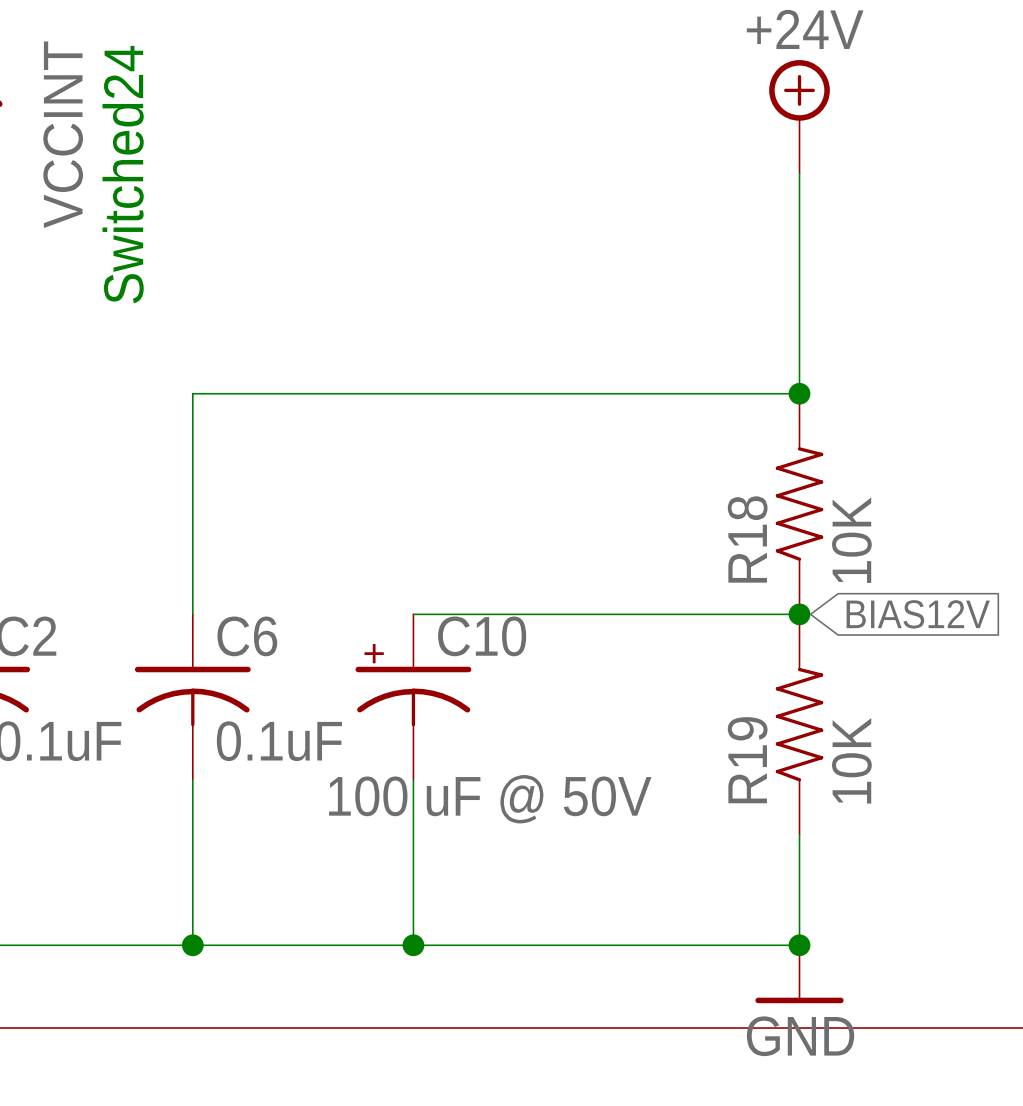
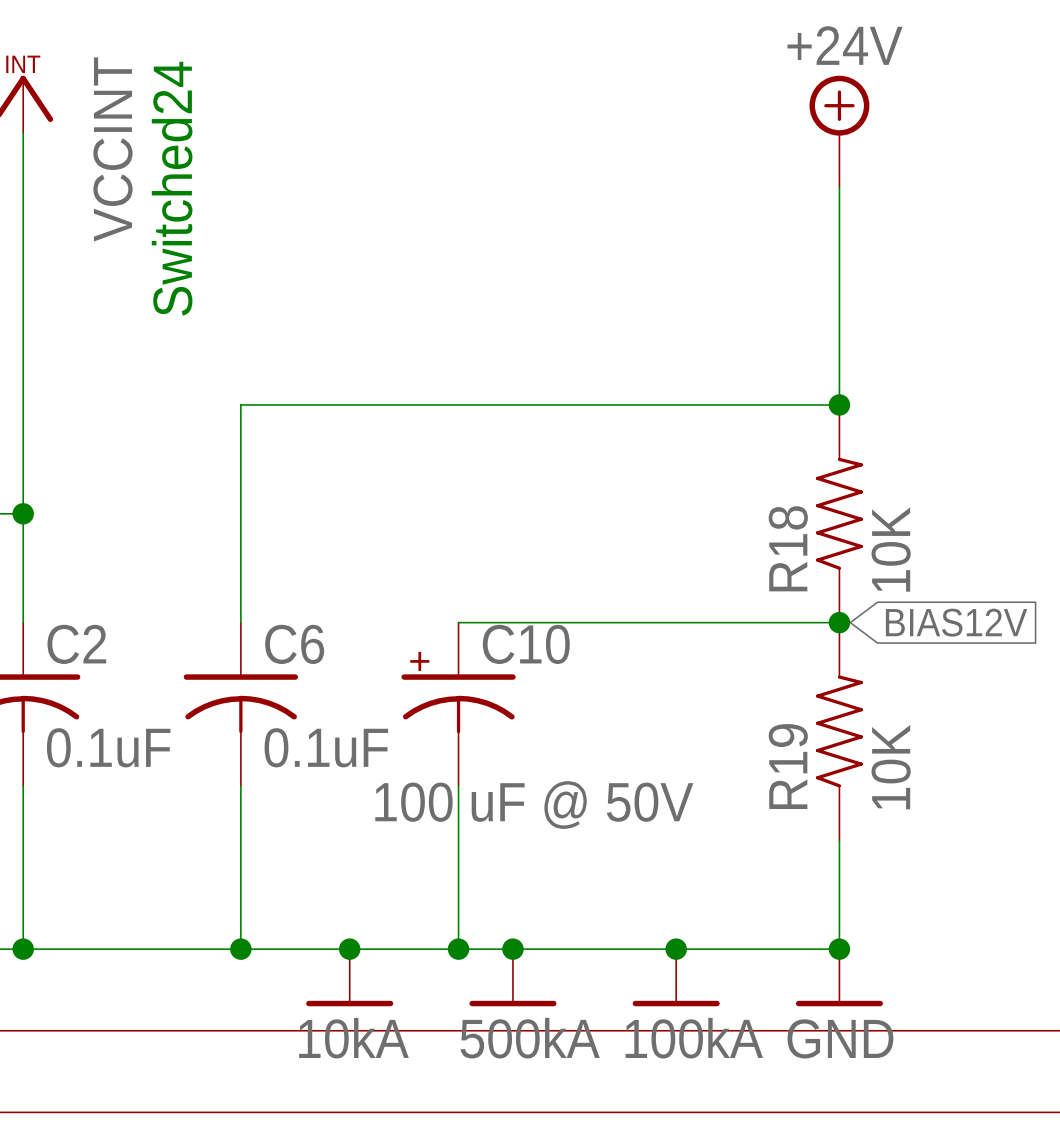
junction: none -> (349, 949)
junction: none -> (512, 949)
junction: none -> (676, 949)
part: none -> 10kA (349, 977)
part: none -> 500kA (512, 977)
part: none -> 100kA (676, 977)

